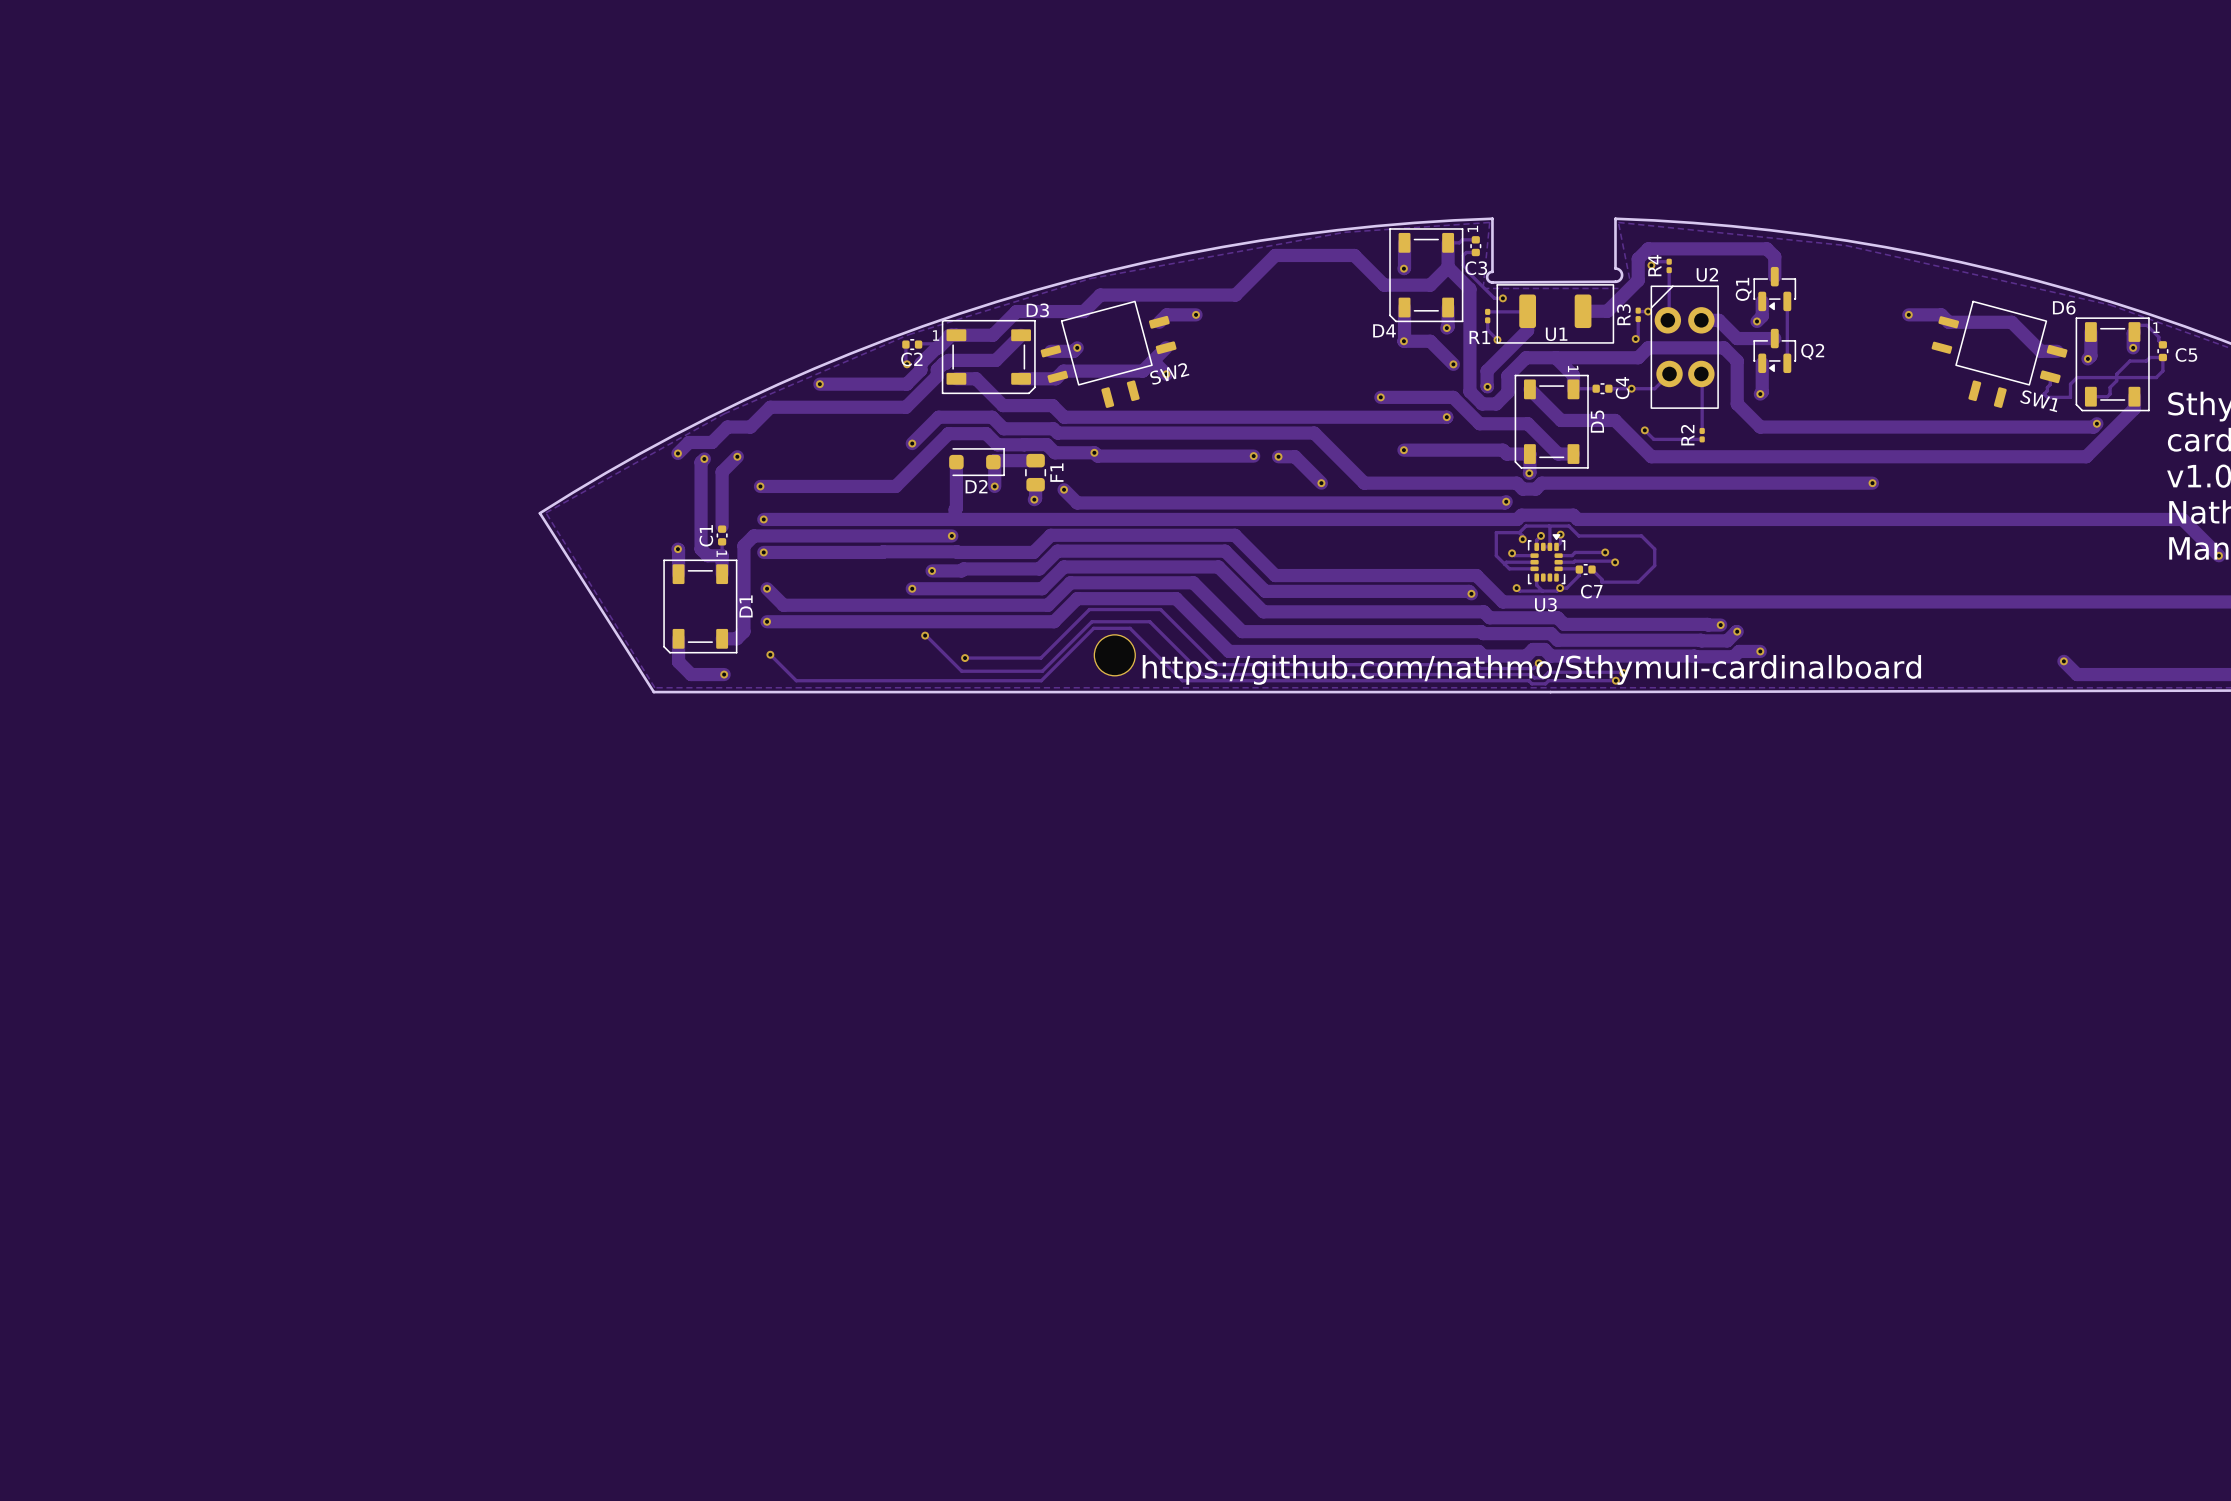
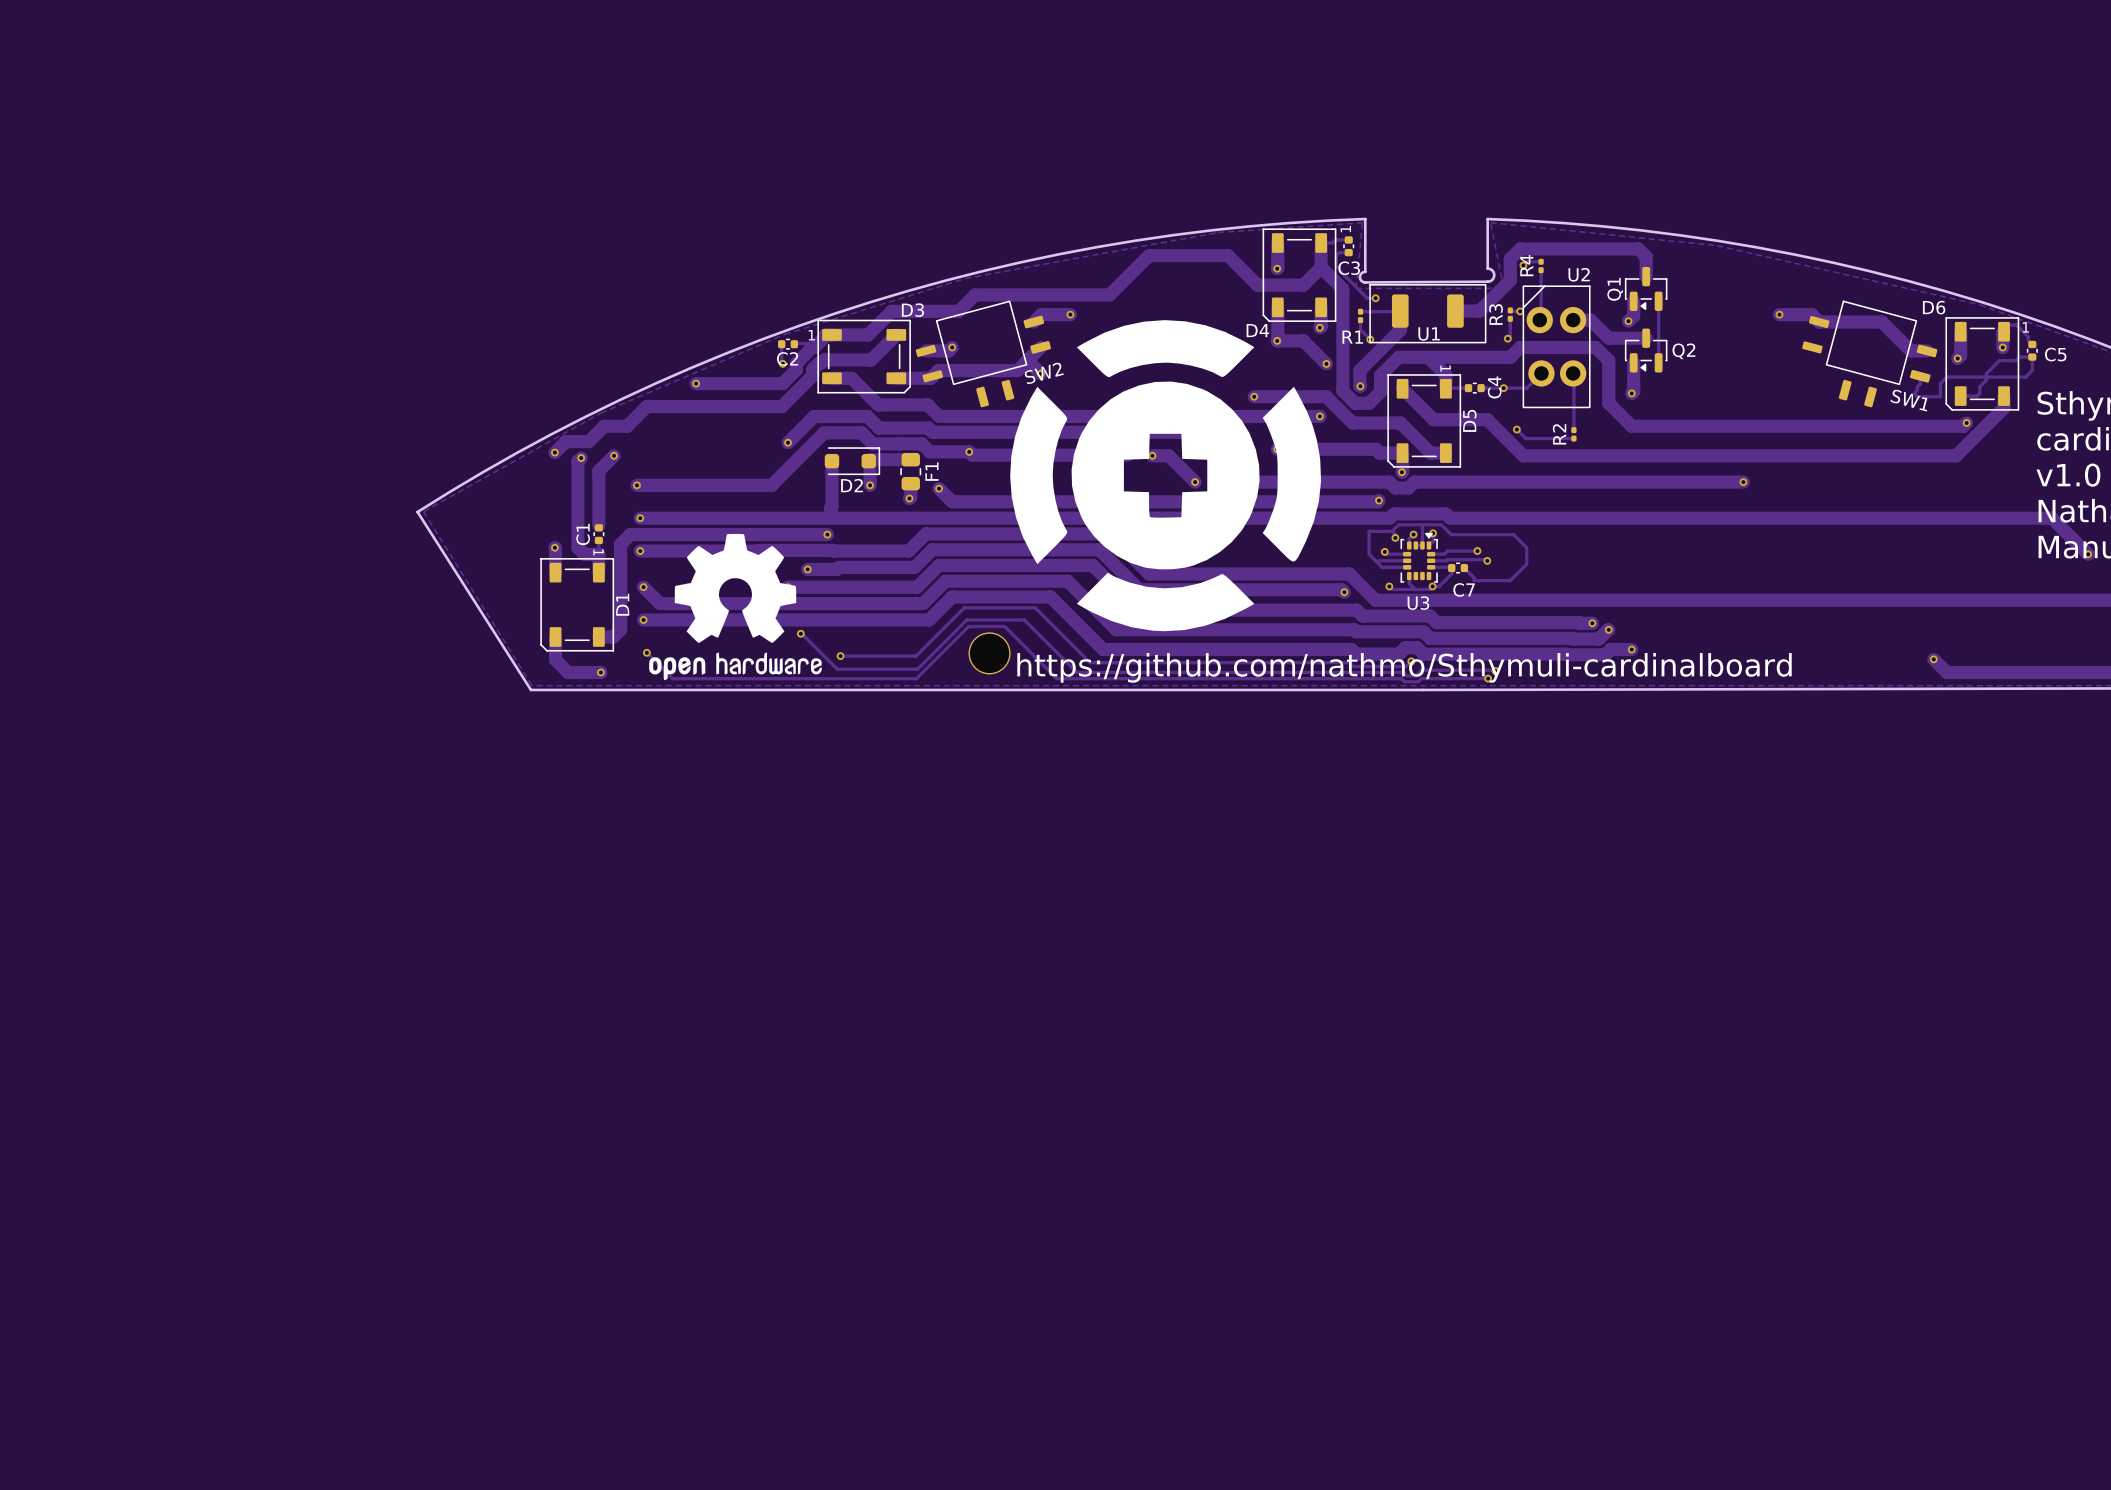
drawing: none -> [1010, 320, 1322, 632]
drawing: none -> [649, 533, 822, 681]

